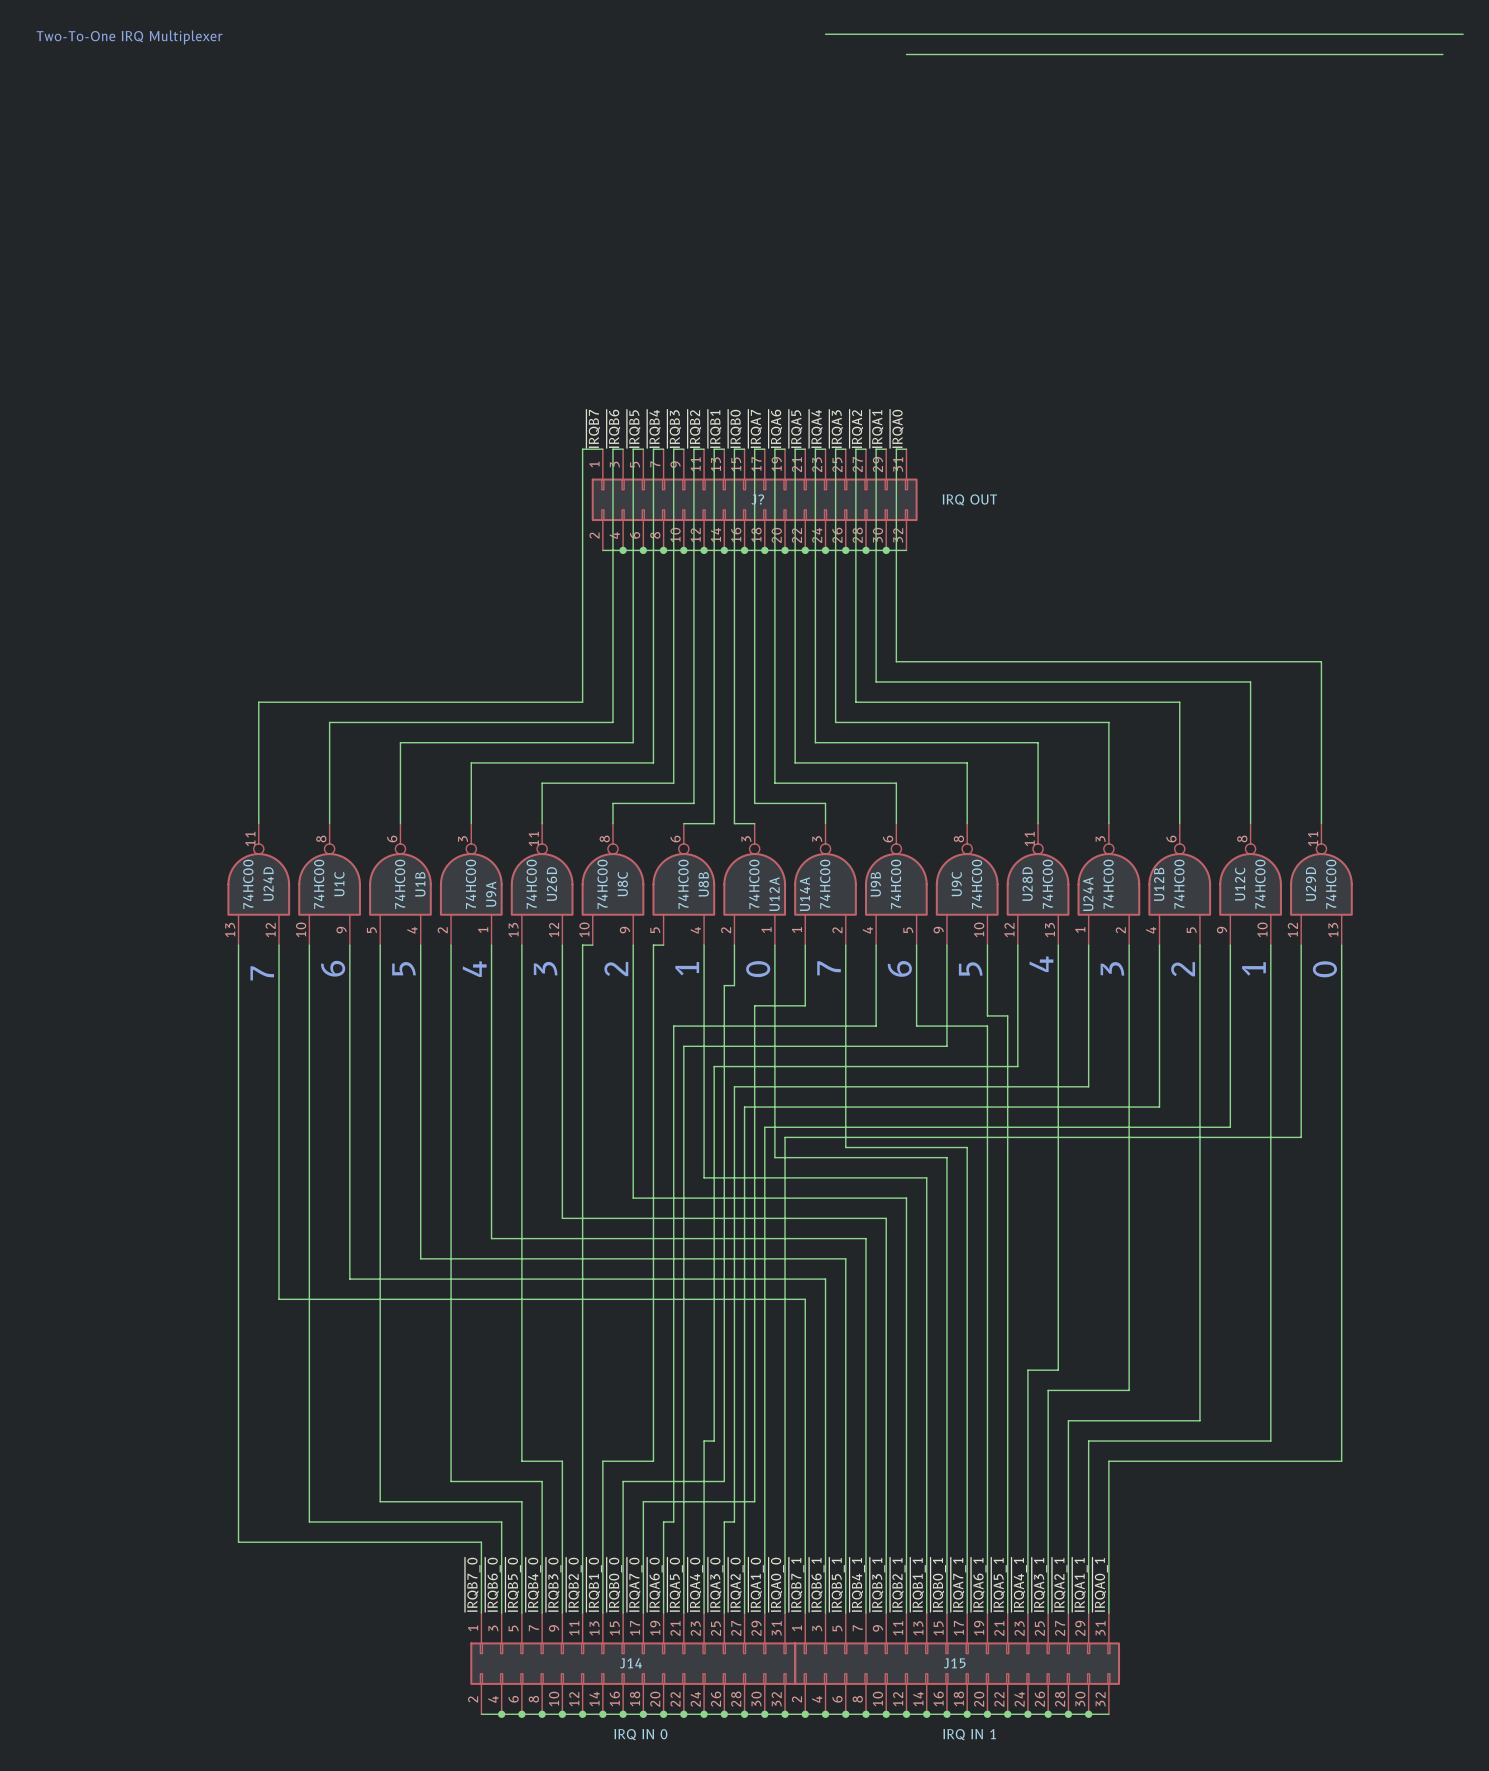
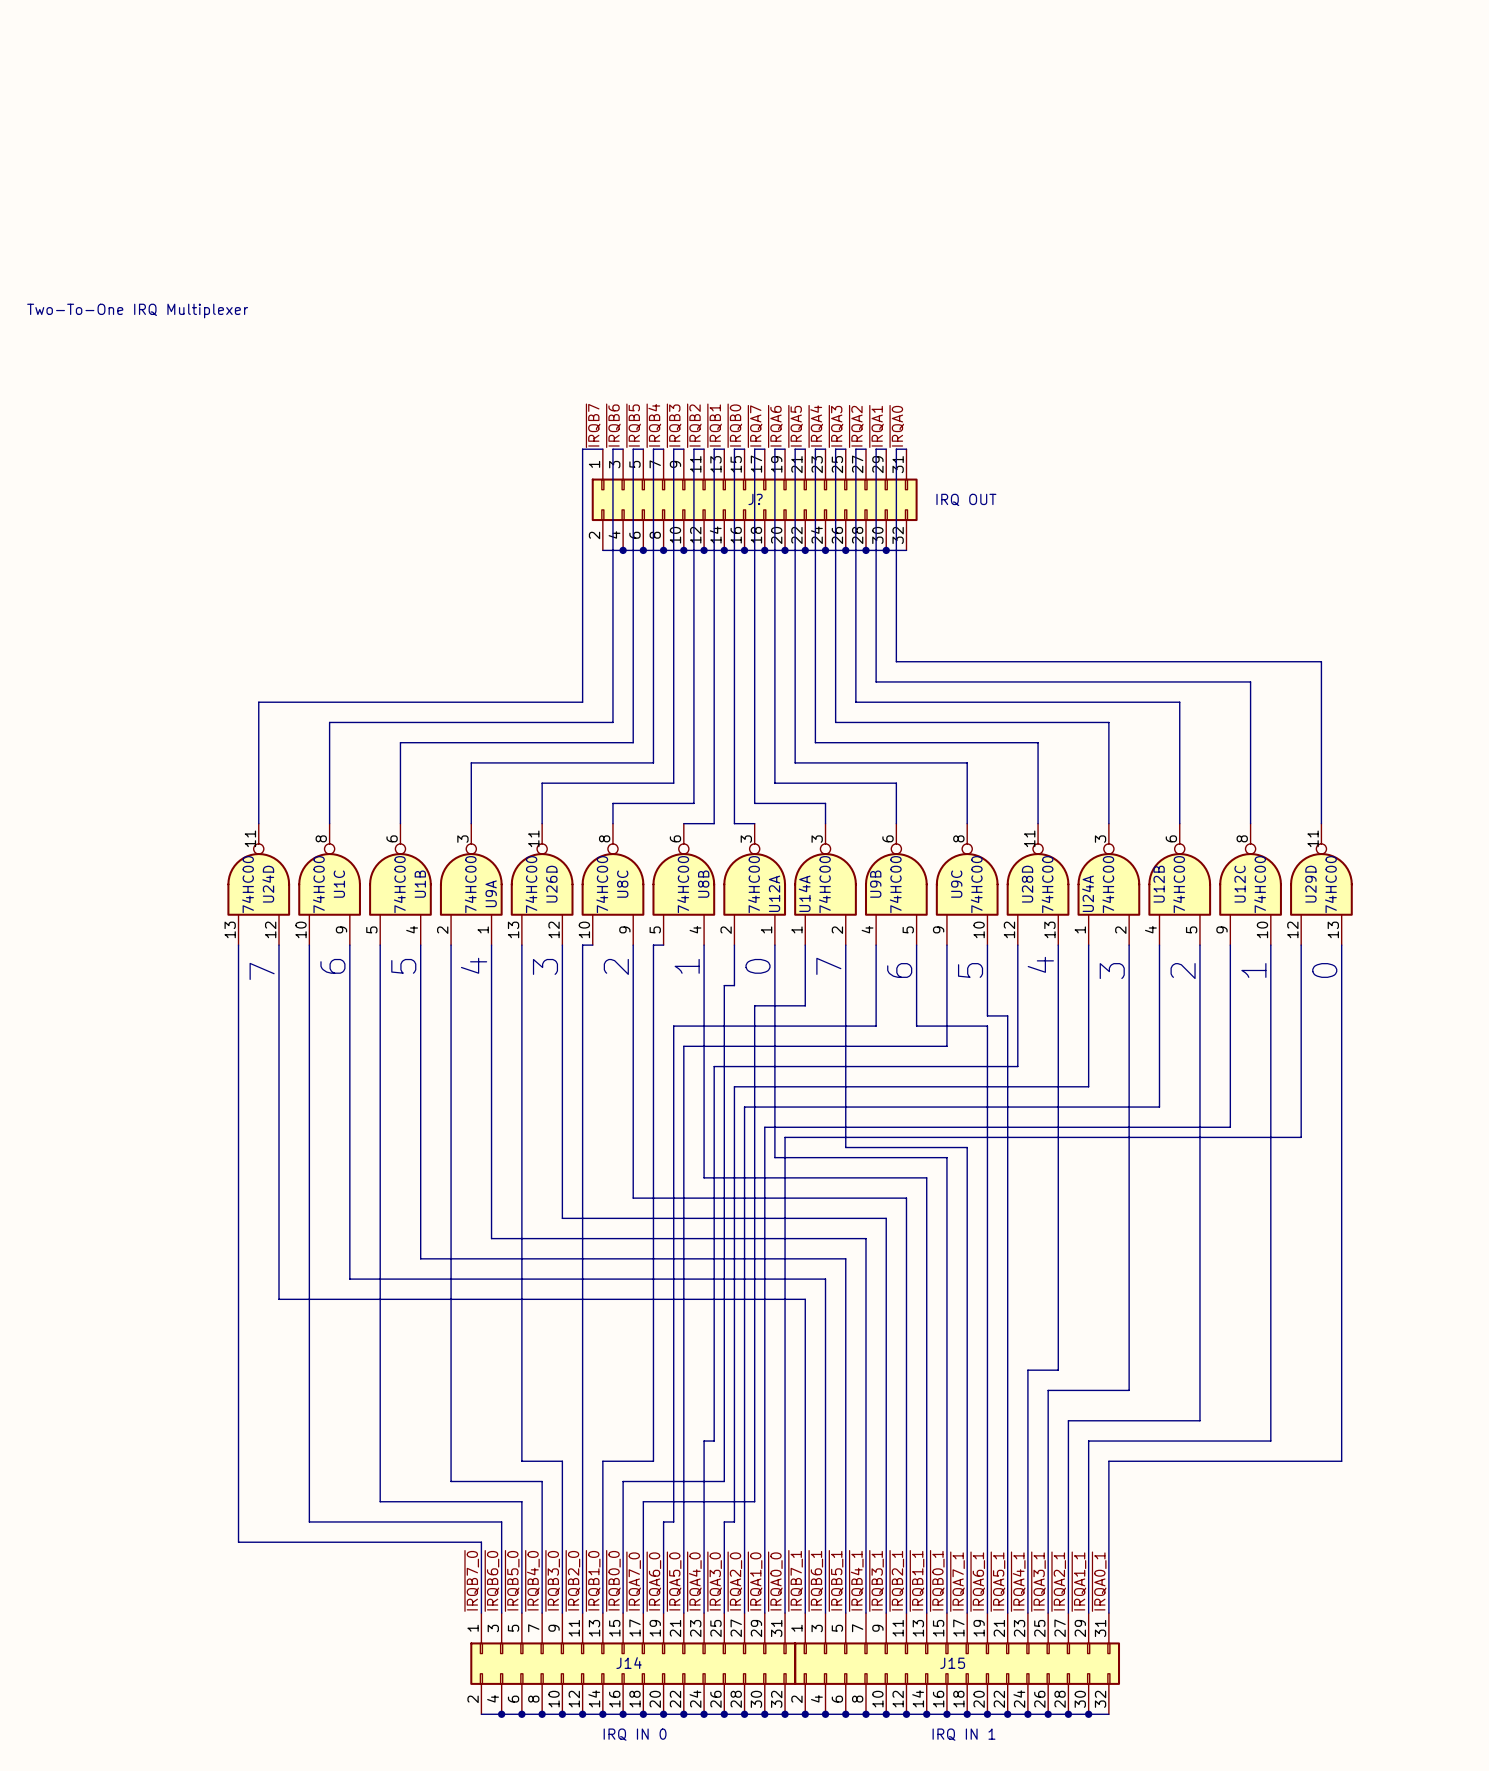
wire: (825, 34) (1463, 34) -> none
text: Two-To-One IRQ Multiplexer (129, 37) -> none
wire: (906, 54) (1442, 54) -> none
text: none -> Two-To-One IRQ Multiplexer (137, 311)

